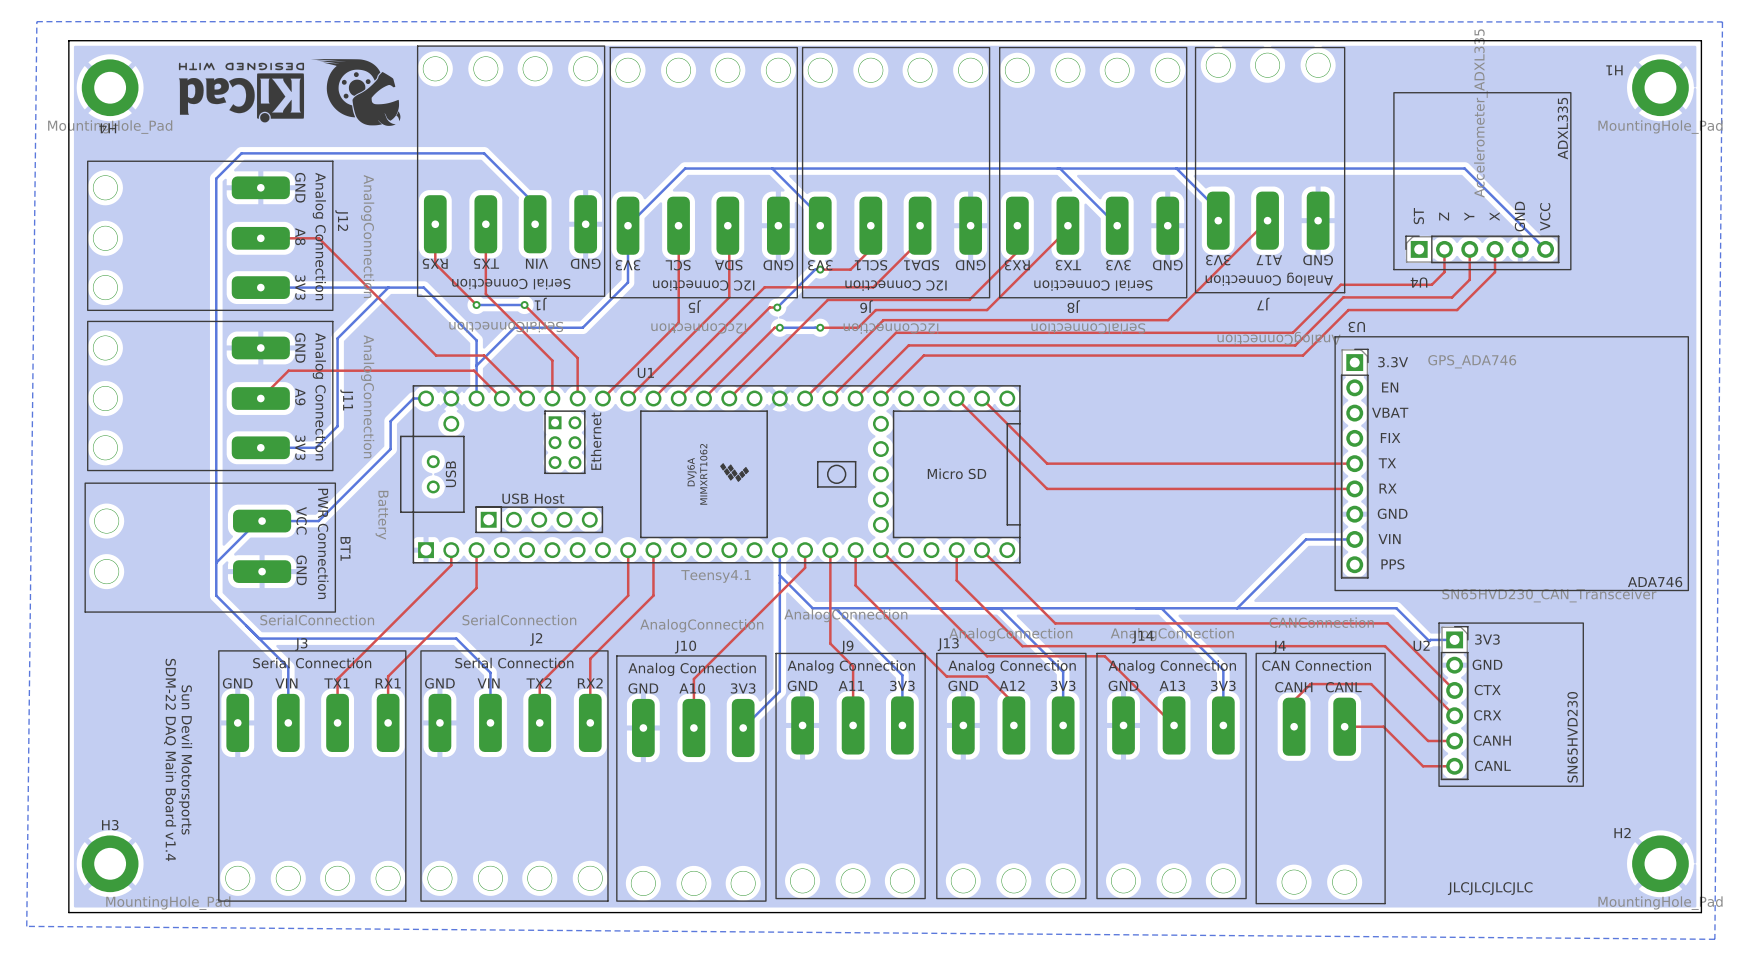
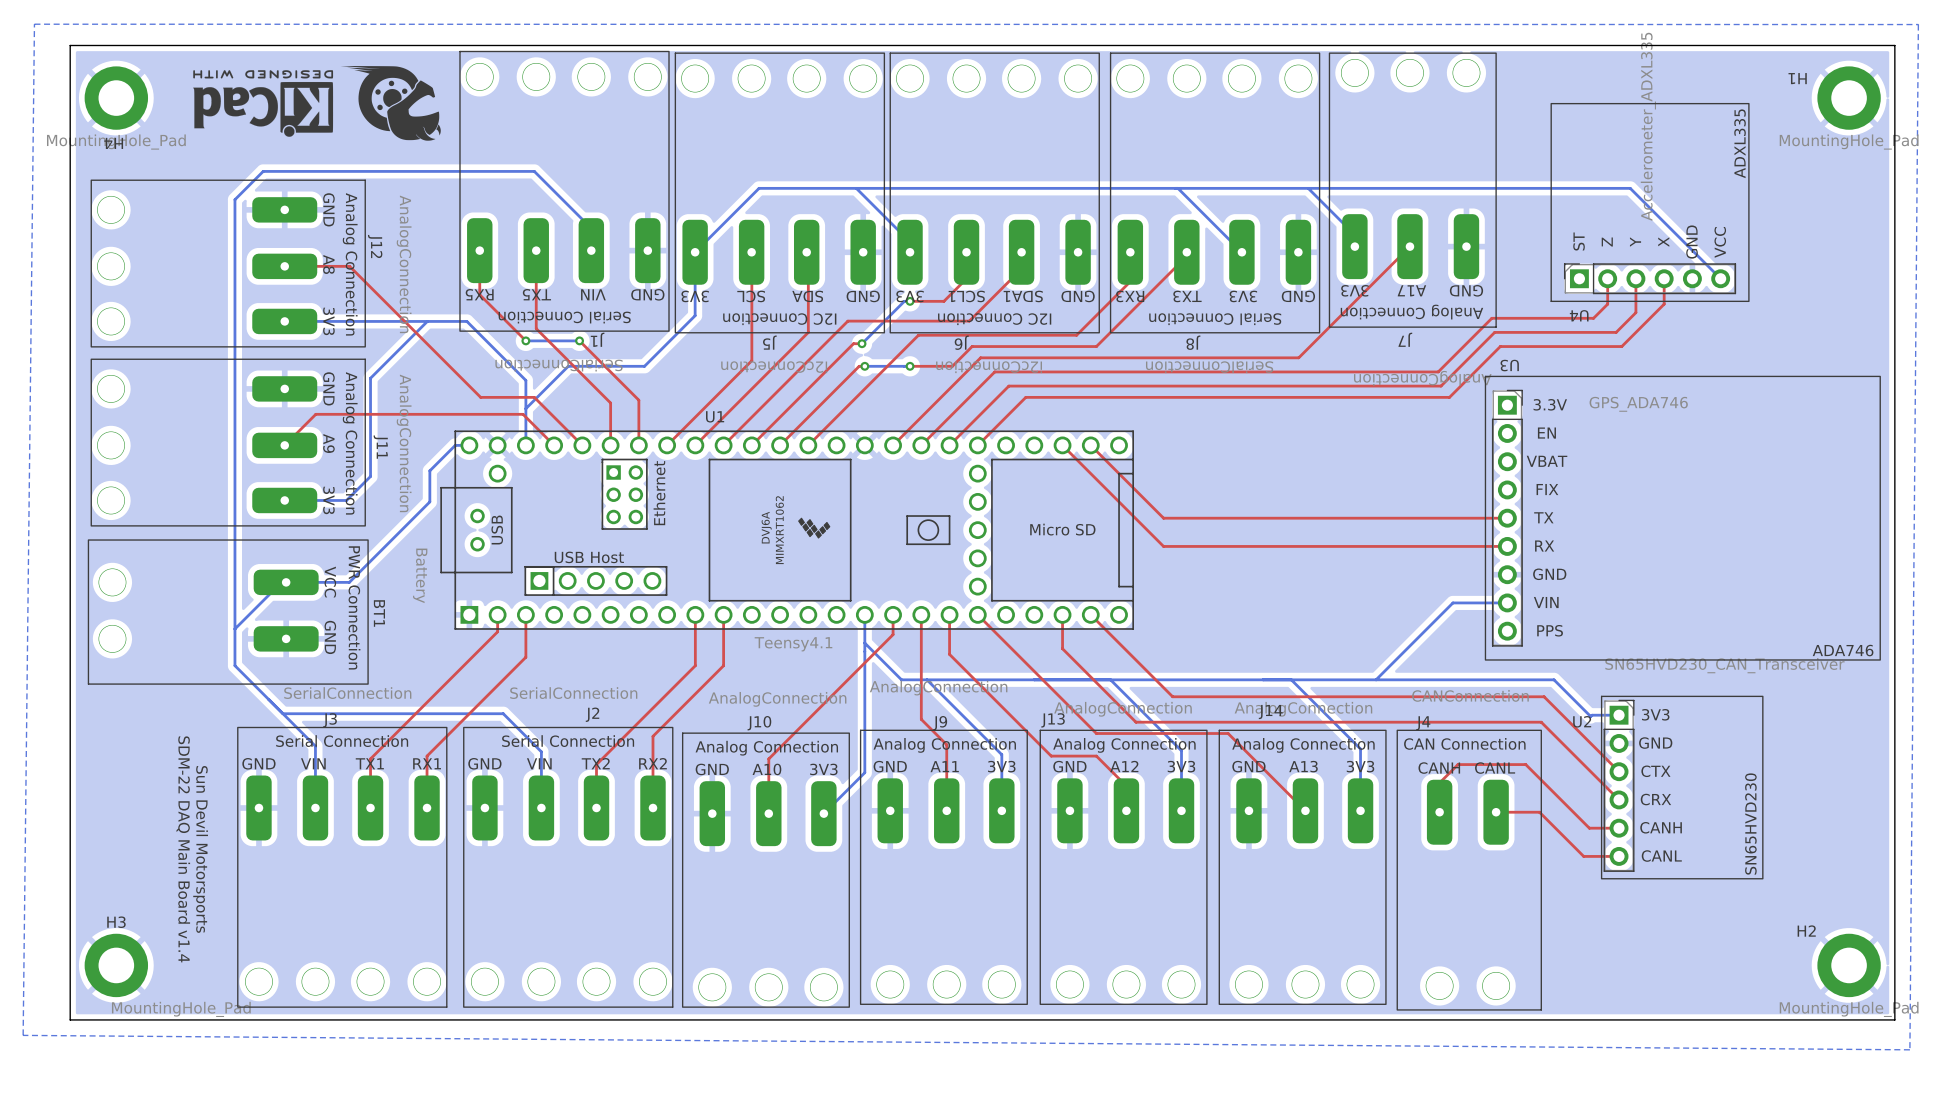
text: JLCJLCJLCJLC (1490, 888) -> none

